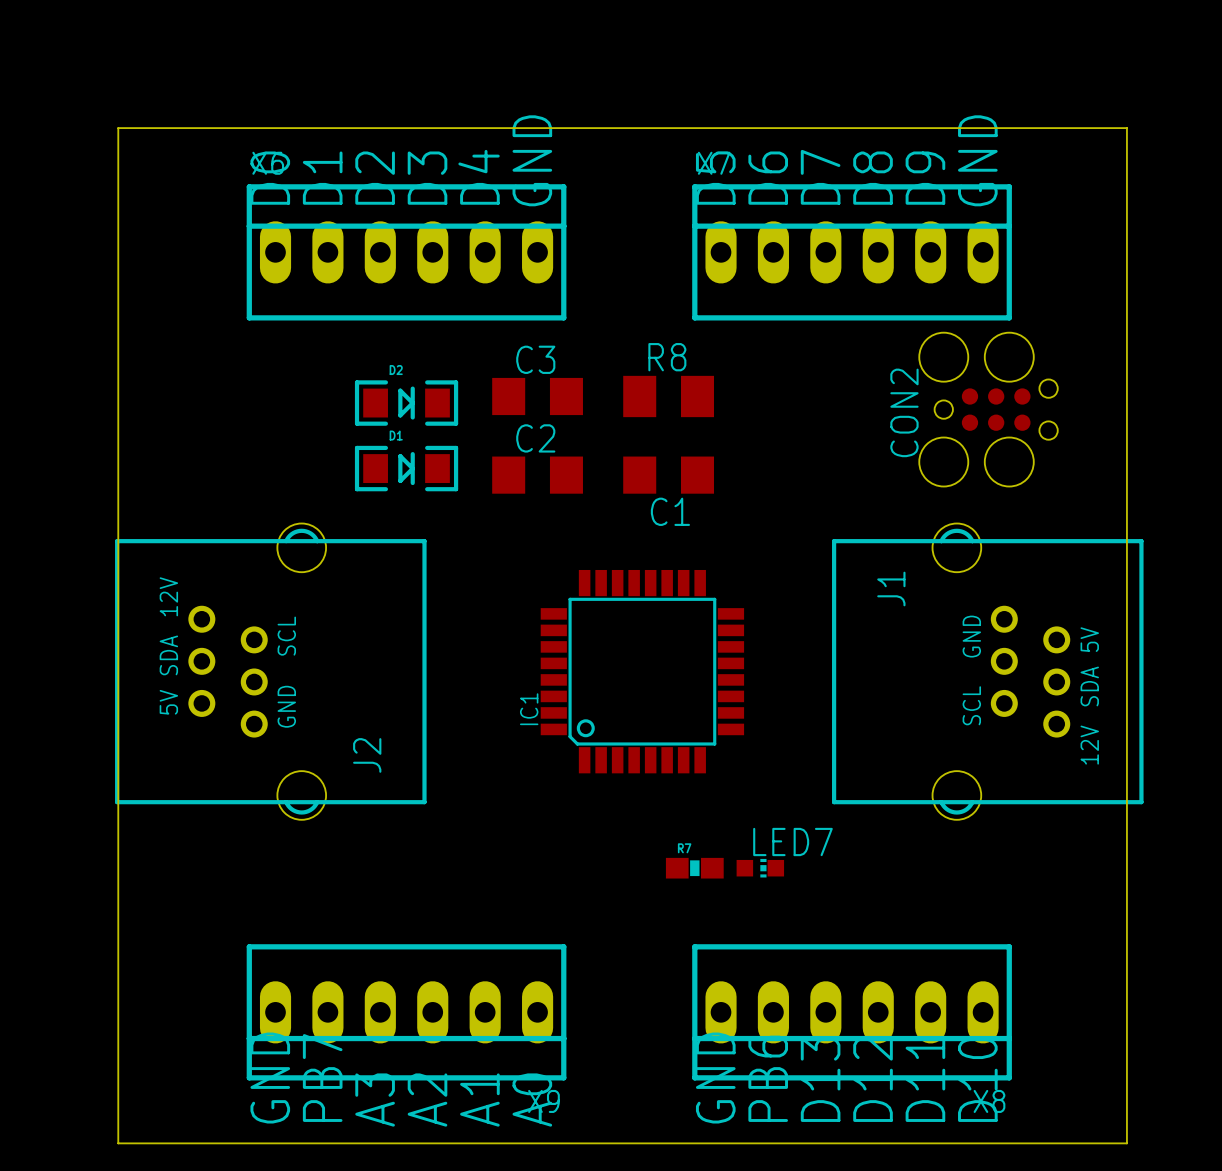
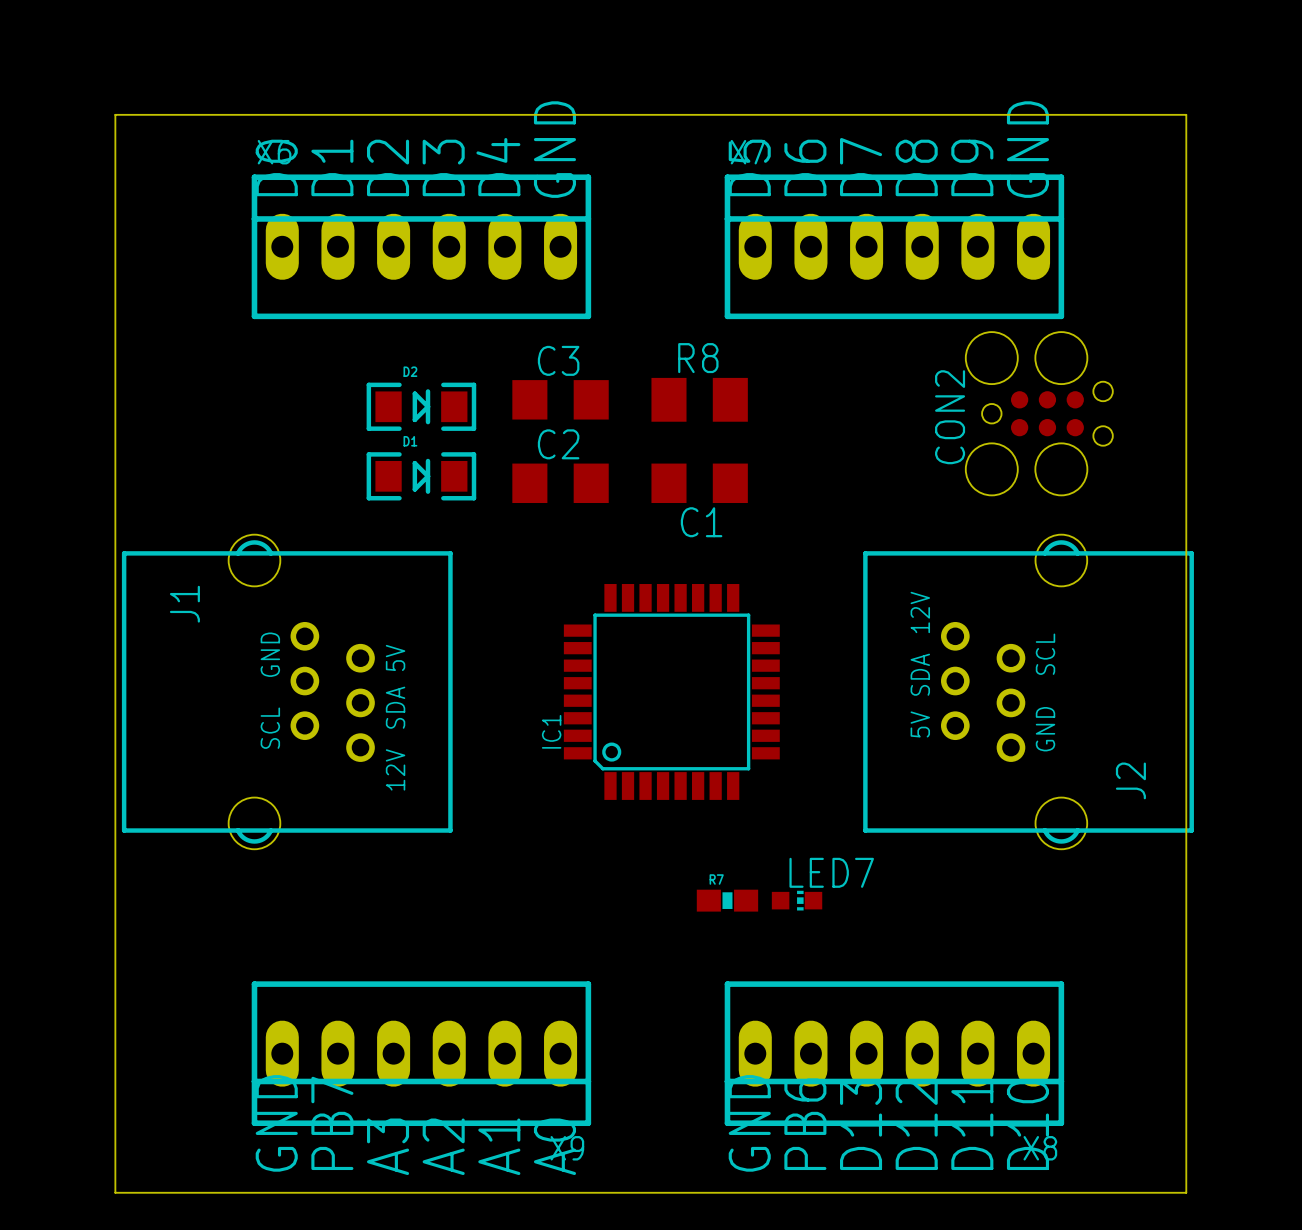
J2 position: (270, 671) -> (1028, 691)
J1 position: (987, 671) -> (287, 691)

